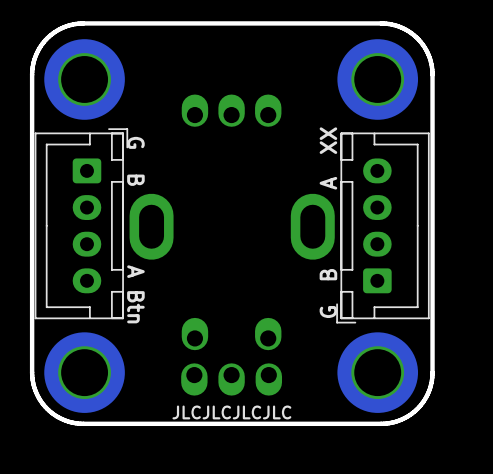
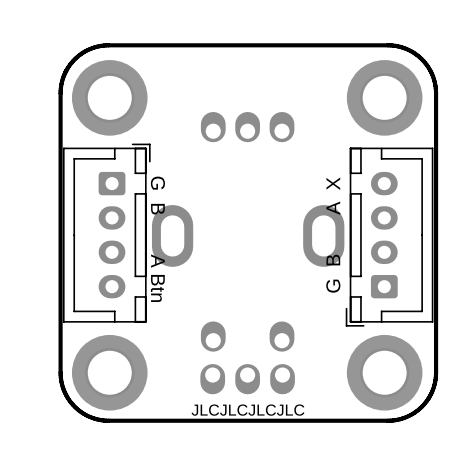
text: G B A XX (328, 222) -> G B A X (333, 235)

